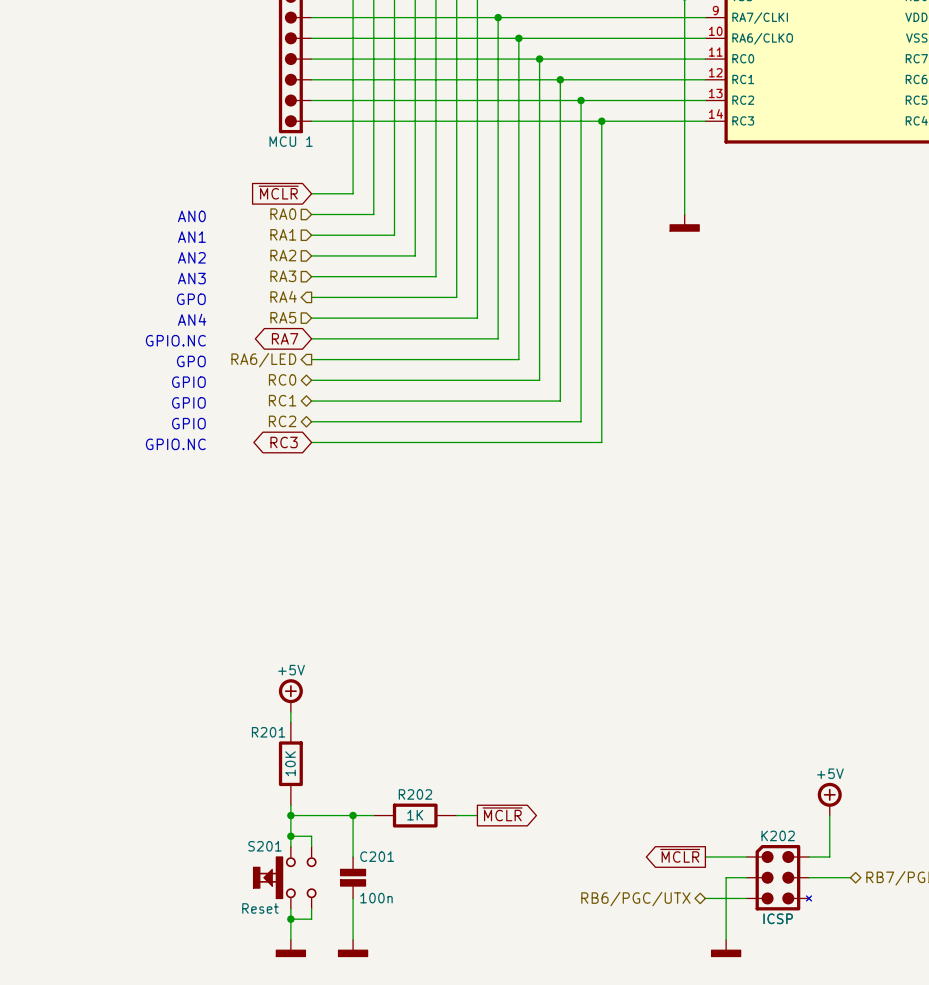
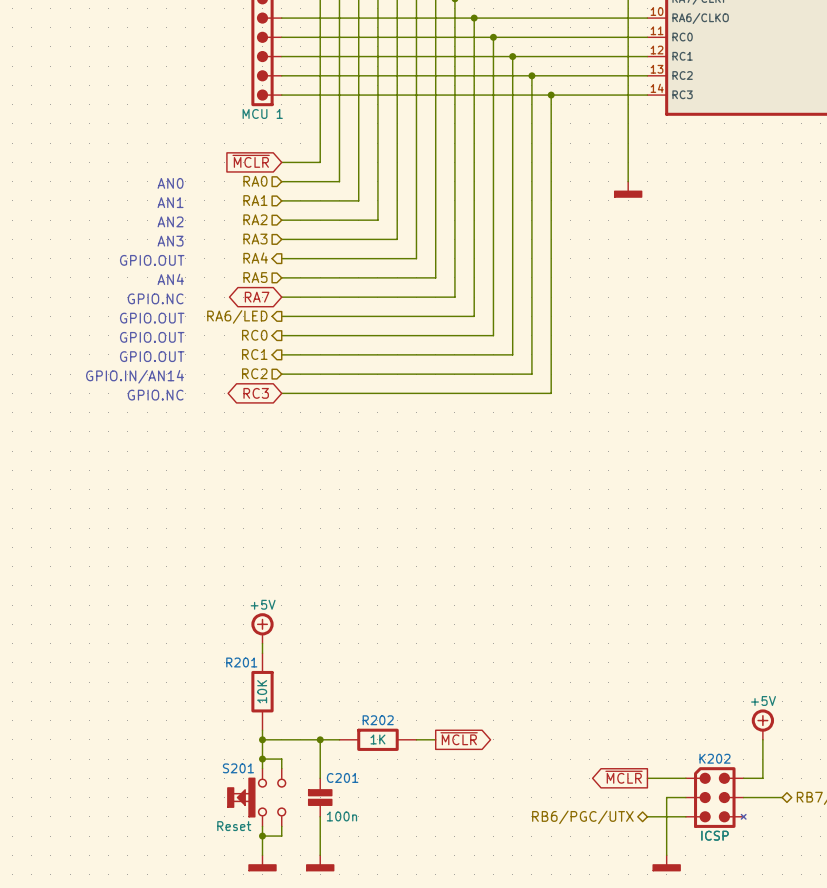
text: GPO (191, 299) -> GPIO.OUT (152, 260)
text: GPO (191, 361) -> GPIO.OUT (152, 318)
hierarchical label shape: bidirectional (282, 379) -> output (254, 335)
text: GPIO (188, 382) -> GPIO.OUT (152, 337)
hierarchical label shape: bidirectional (282, 400) -> output (254, 354)
text: GPIO (188, 402) -> GPIO.OUT (152, 356)
hierarchical label shape: bidirectional (282, 421) -> input (254, 373)
text: GPIO (188, 423) -> GPIO.IN/AN14 (135, 376)

